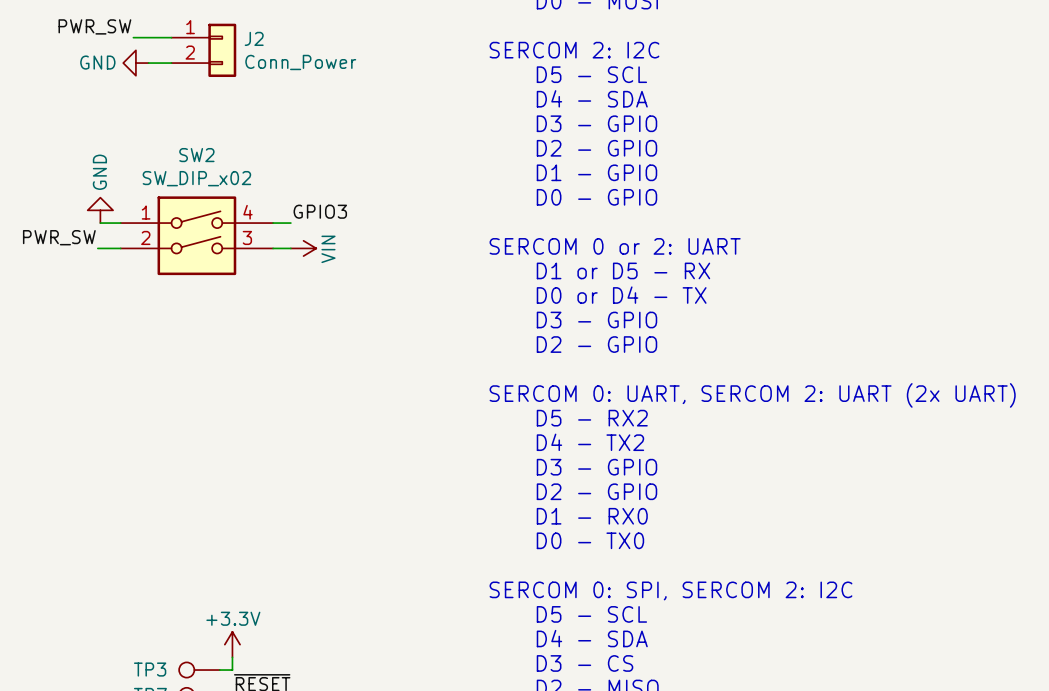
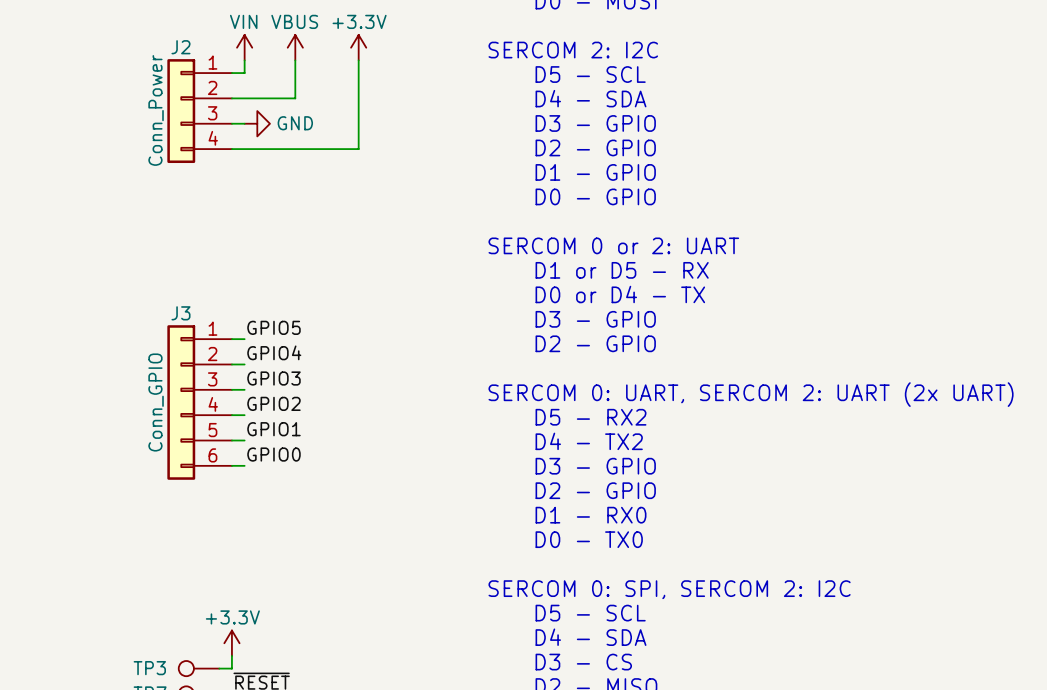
J2 symbol: [171, 23, 237, 78] -> [167, 59, 232, 164]
label: PWR_SW (94, 26) -> none
wire: (133, 37) (171, 37) -> none
J2 name position: J2 (254, 38) -> J2 (180, 47)
power symbol: none -> VBUS (295, 47)
power symbol: none -> +3.3V (358, 47)
wire: none -> (244, 60) (244, 73) (231, 73)
wire: none -> (295, 60) (295, 98) (231, 98)
wire: none -> (358, 60) (358, 149) (231, 149)
J2 value position: Conn_Power (300, 62) -> Conn_Power (156, 110)
power symbol: GND (135, 63) -> none
wire: (148, 63) (171, 63) -> none
wire: none -> (231, 123) (244, 123)
power symbol: none -> GND (257, 123)
power symbol: GND (100, 210) -> none
label position: GPIO3 (320, 211) -> GPIO3 (273, 378)
wire: (100, 223) (120, 223) -> none
wire: (273, 223) (290, 223) -> none
SW2: SW_DIP_x02 (196, 235) -> none
label: PWR_SW (59, 237) -> none
wire: (97, 248) (120, 248) -> none
wire: (273, 248) (290, 248) -> none
power symbol rotation: 0° (303, 248) -> 90° counterclockwise (244, 47)
power symbol position: VIN (303, 248) -> VIN (244, 47)
label: none -> GPIO5 (273, 327)
wire: none -> (231, 339) (244, 339)
label: none -> GPIO4 (274, 352)
wire: none -> (231, 364) (244, 364)
wire: none -> (231, 389) (244, 389)
J3: none -> Conn_GPIO (199, 402)
label: none -> GPIO2 (273, 403)
wire: none -> (231, 415) (244, 415)
label: none -> GPIO1 (273, 429)
wire: none -> (231, 440) (244, 440)
label: none -> GPIO0 (273, 454)
wire: none -> (231, 465) (244, 465)

